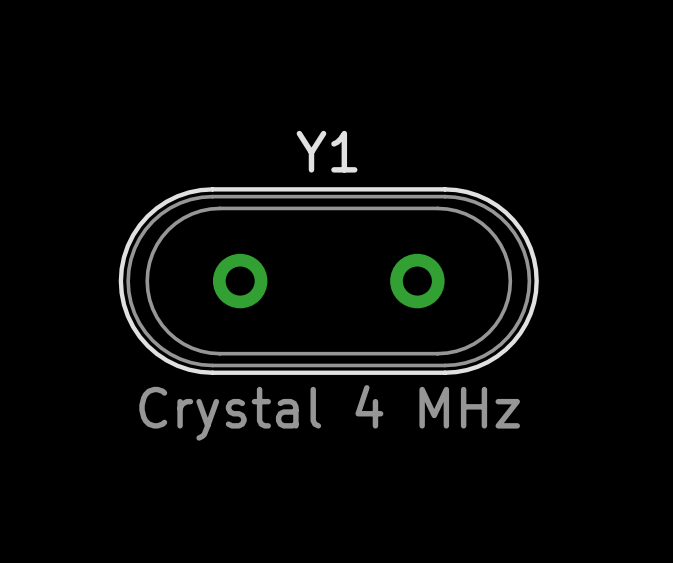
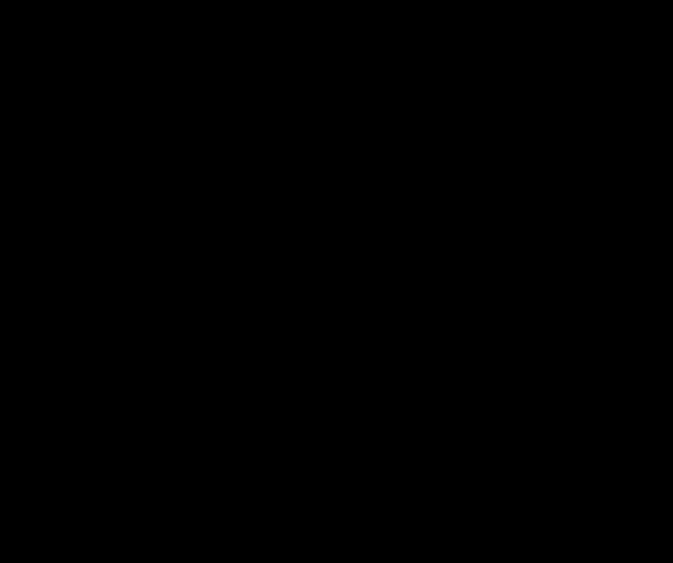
Y1: Crystal 4 MHz (328, 281) -> none

